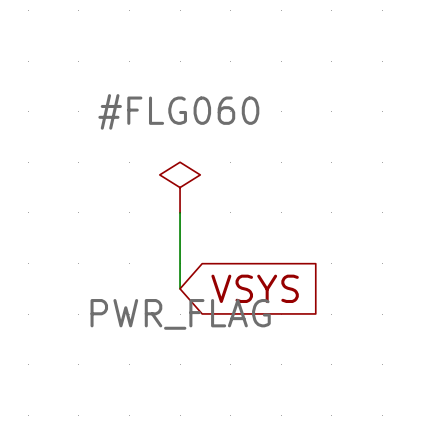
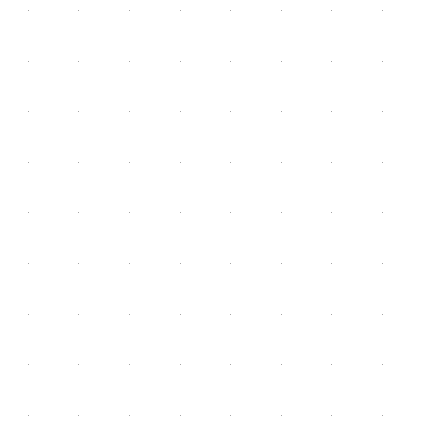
#FLG060: PWR_FLAG (180, 187) -> none
wire: (180, 212) (180, 288) -> none
global label: VSYS (255, 288) -> none

